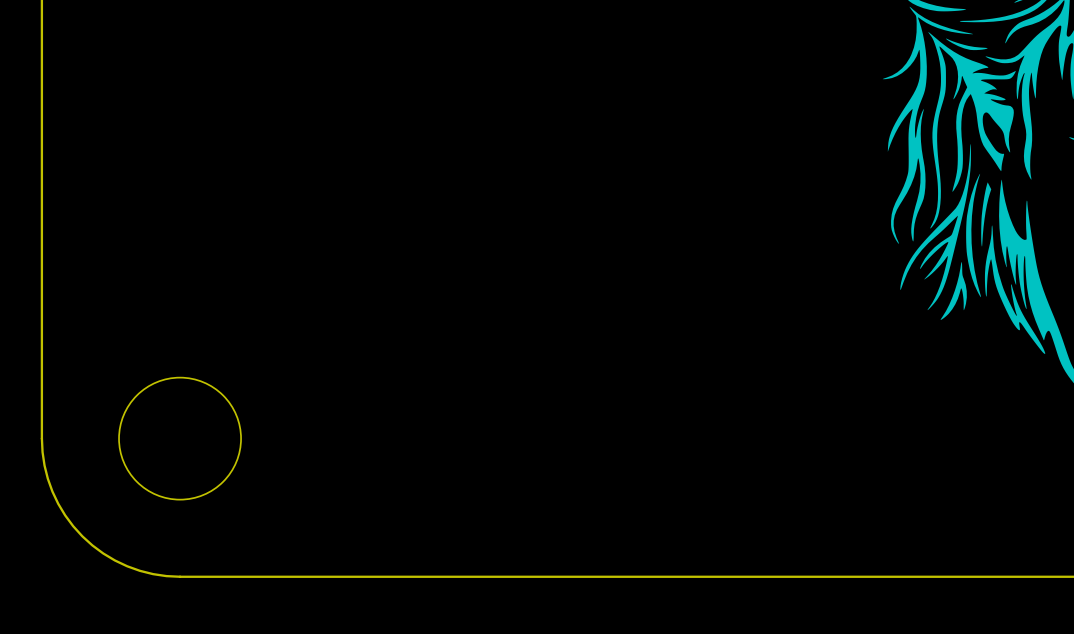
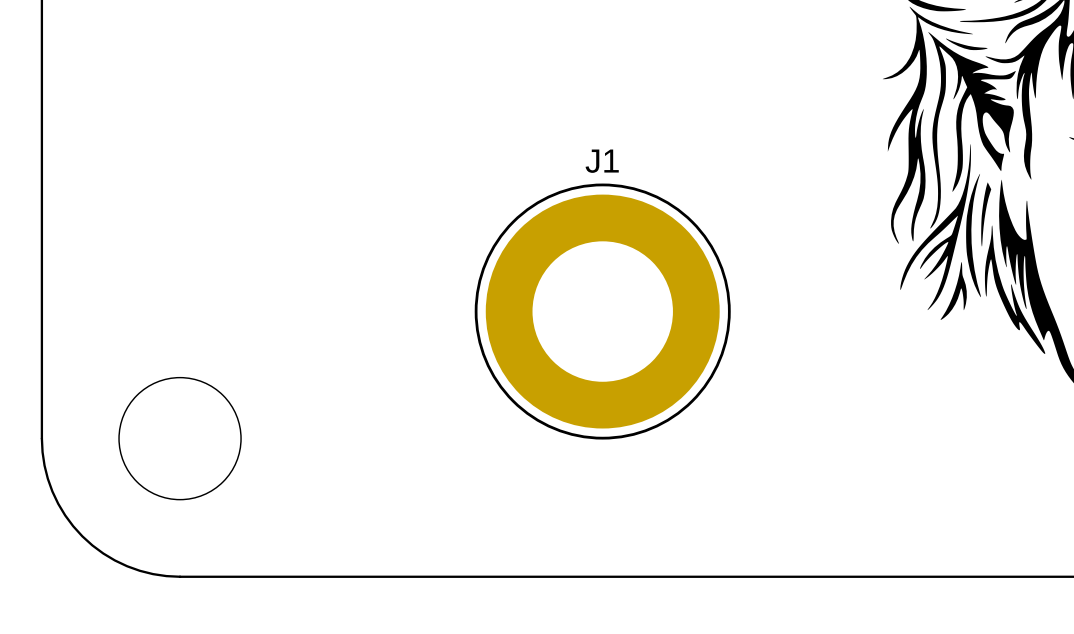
J1: none -> (602, 311)

